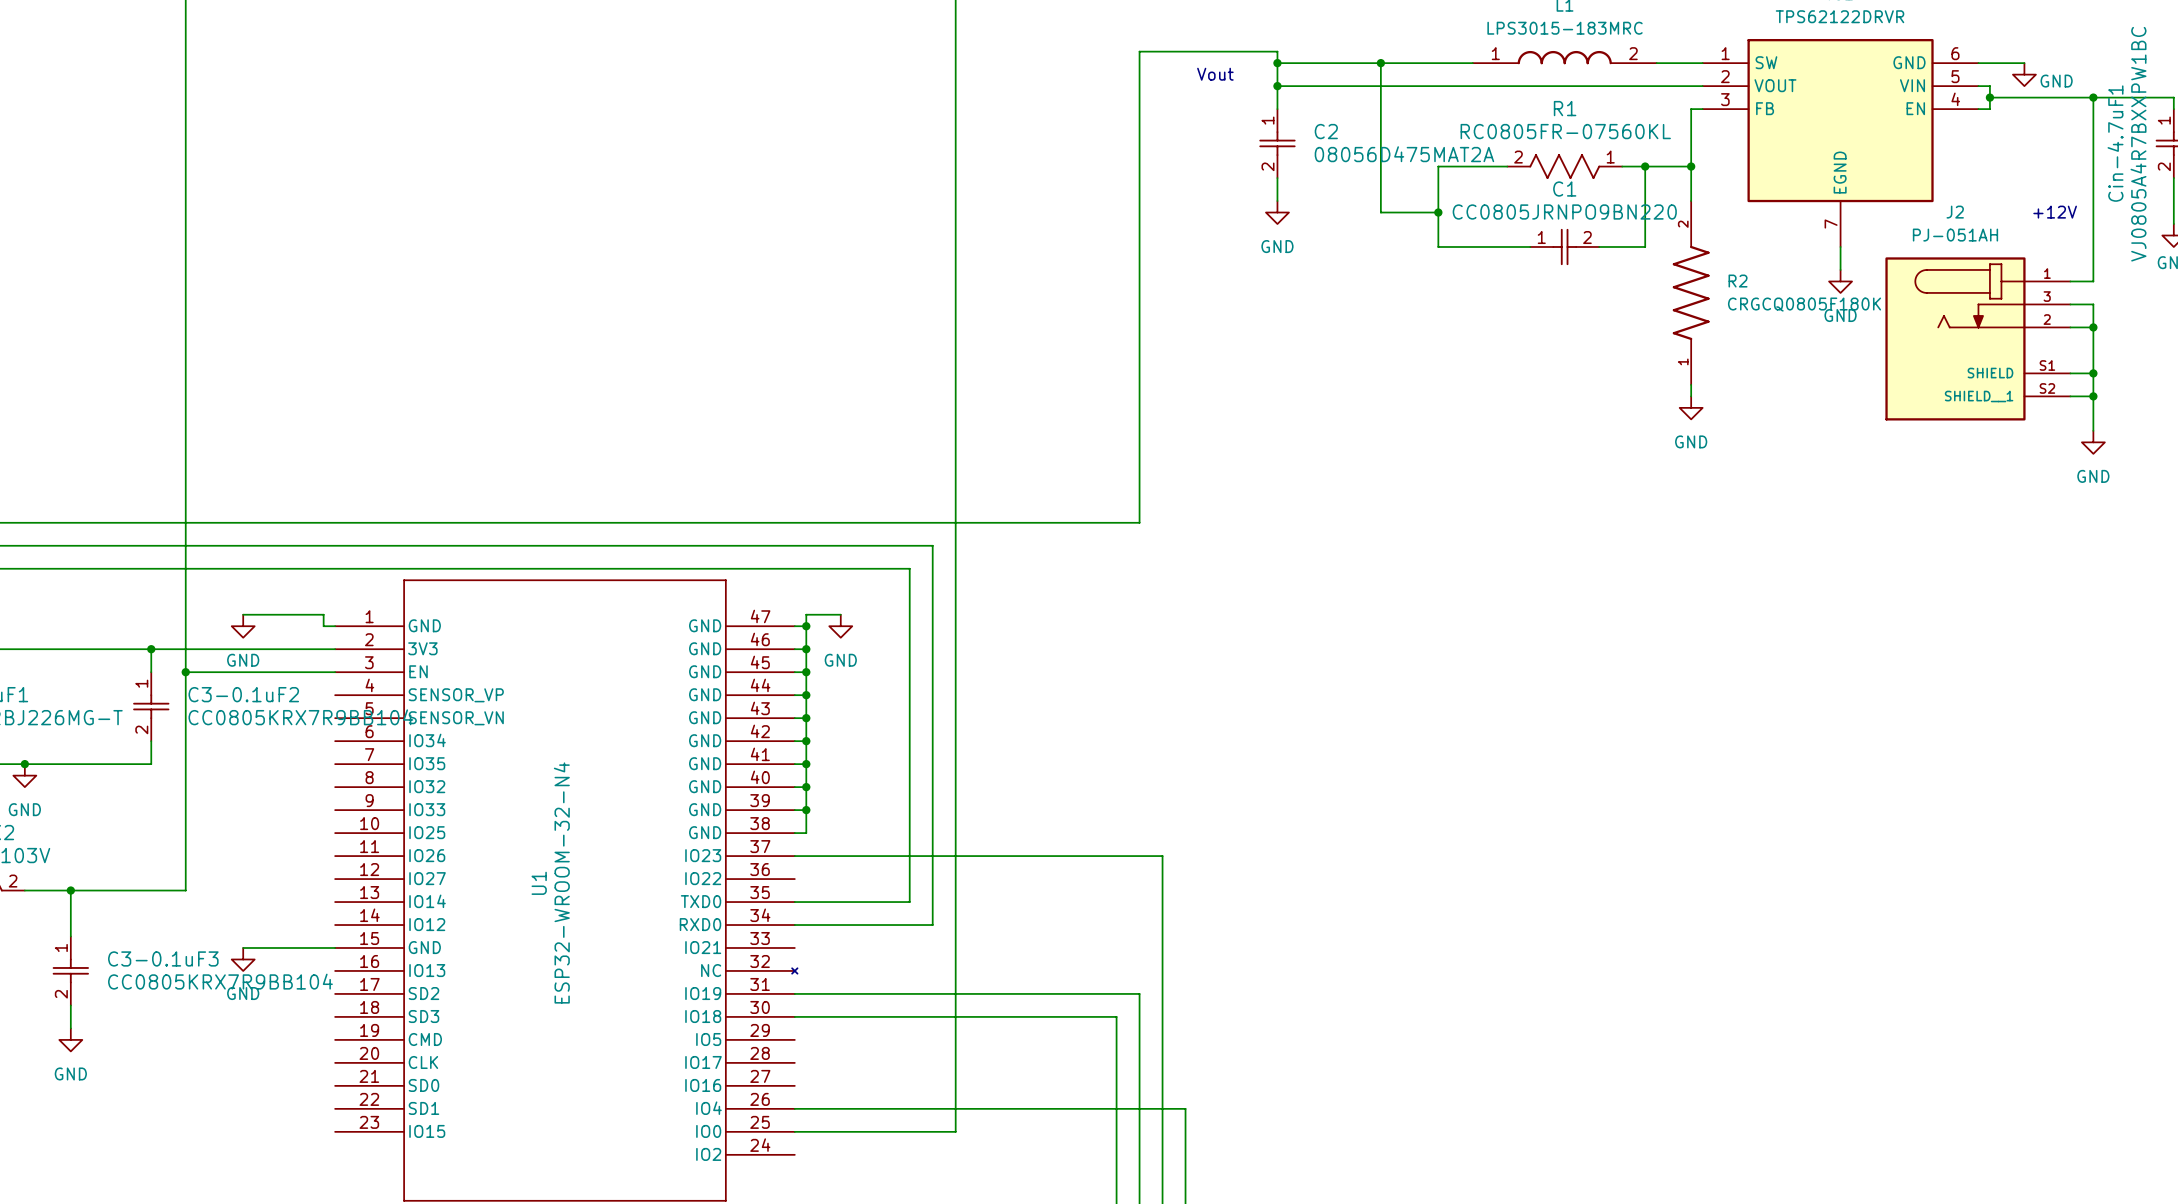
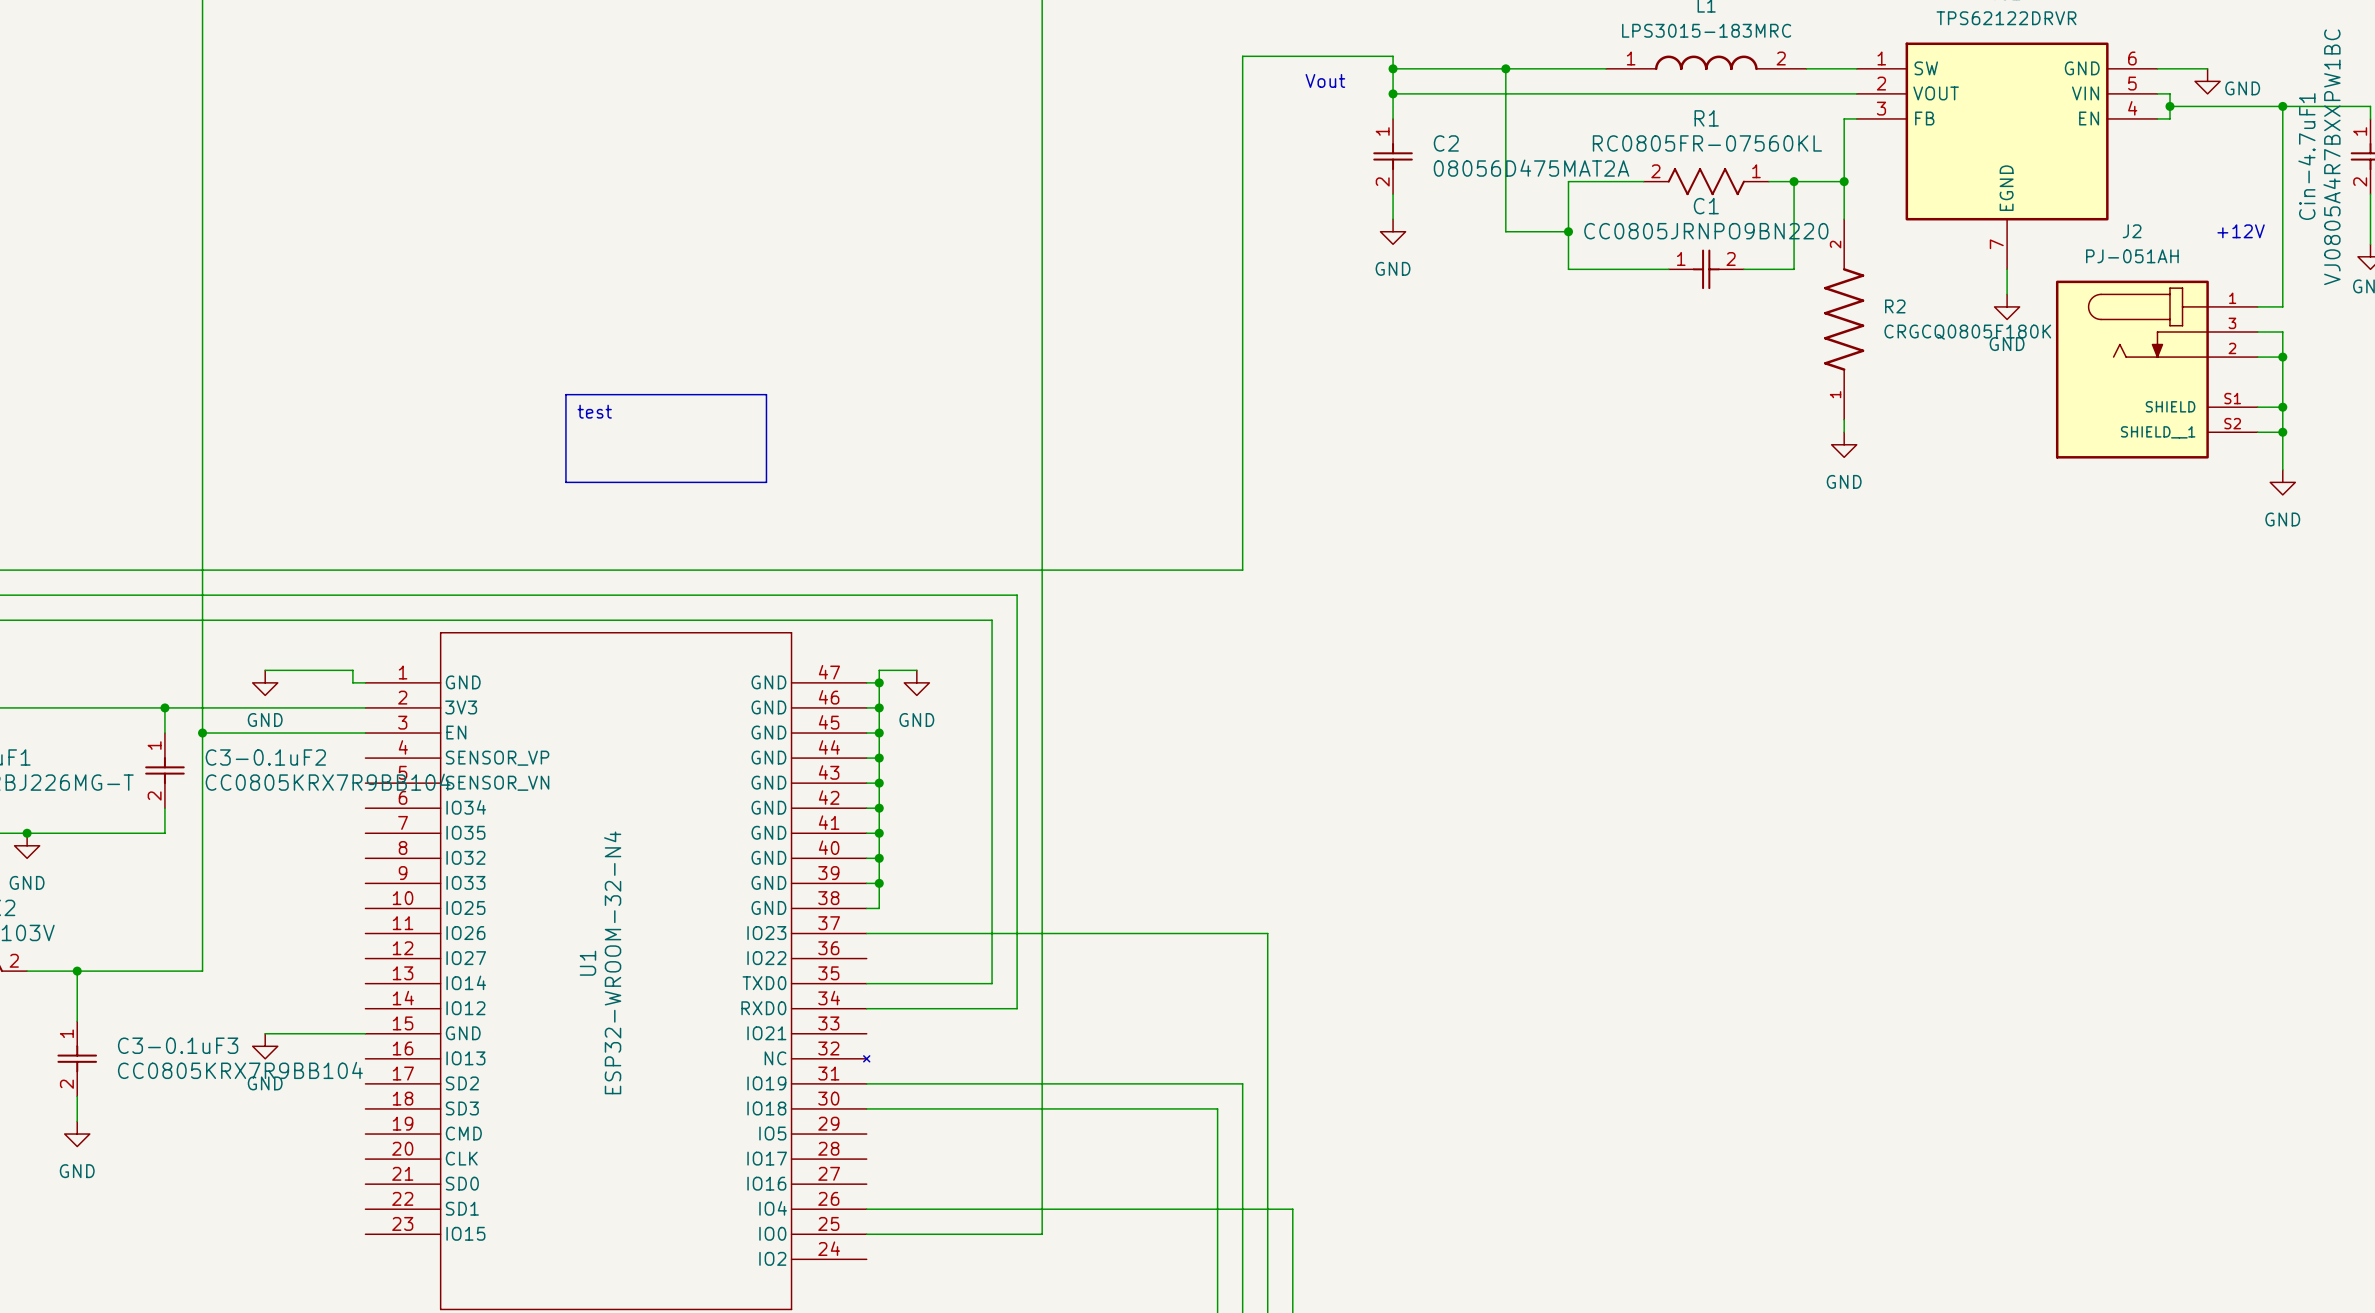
line: none -> (565, 394) (766, 394) (766, 482) (565, 482) (565, 394)
text: none -> test (594, 411)

